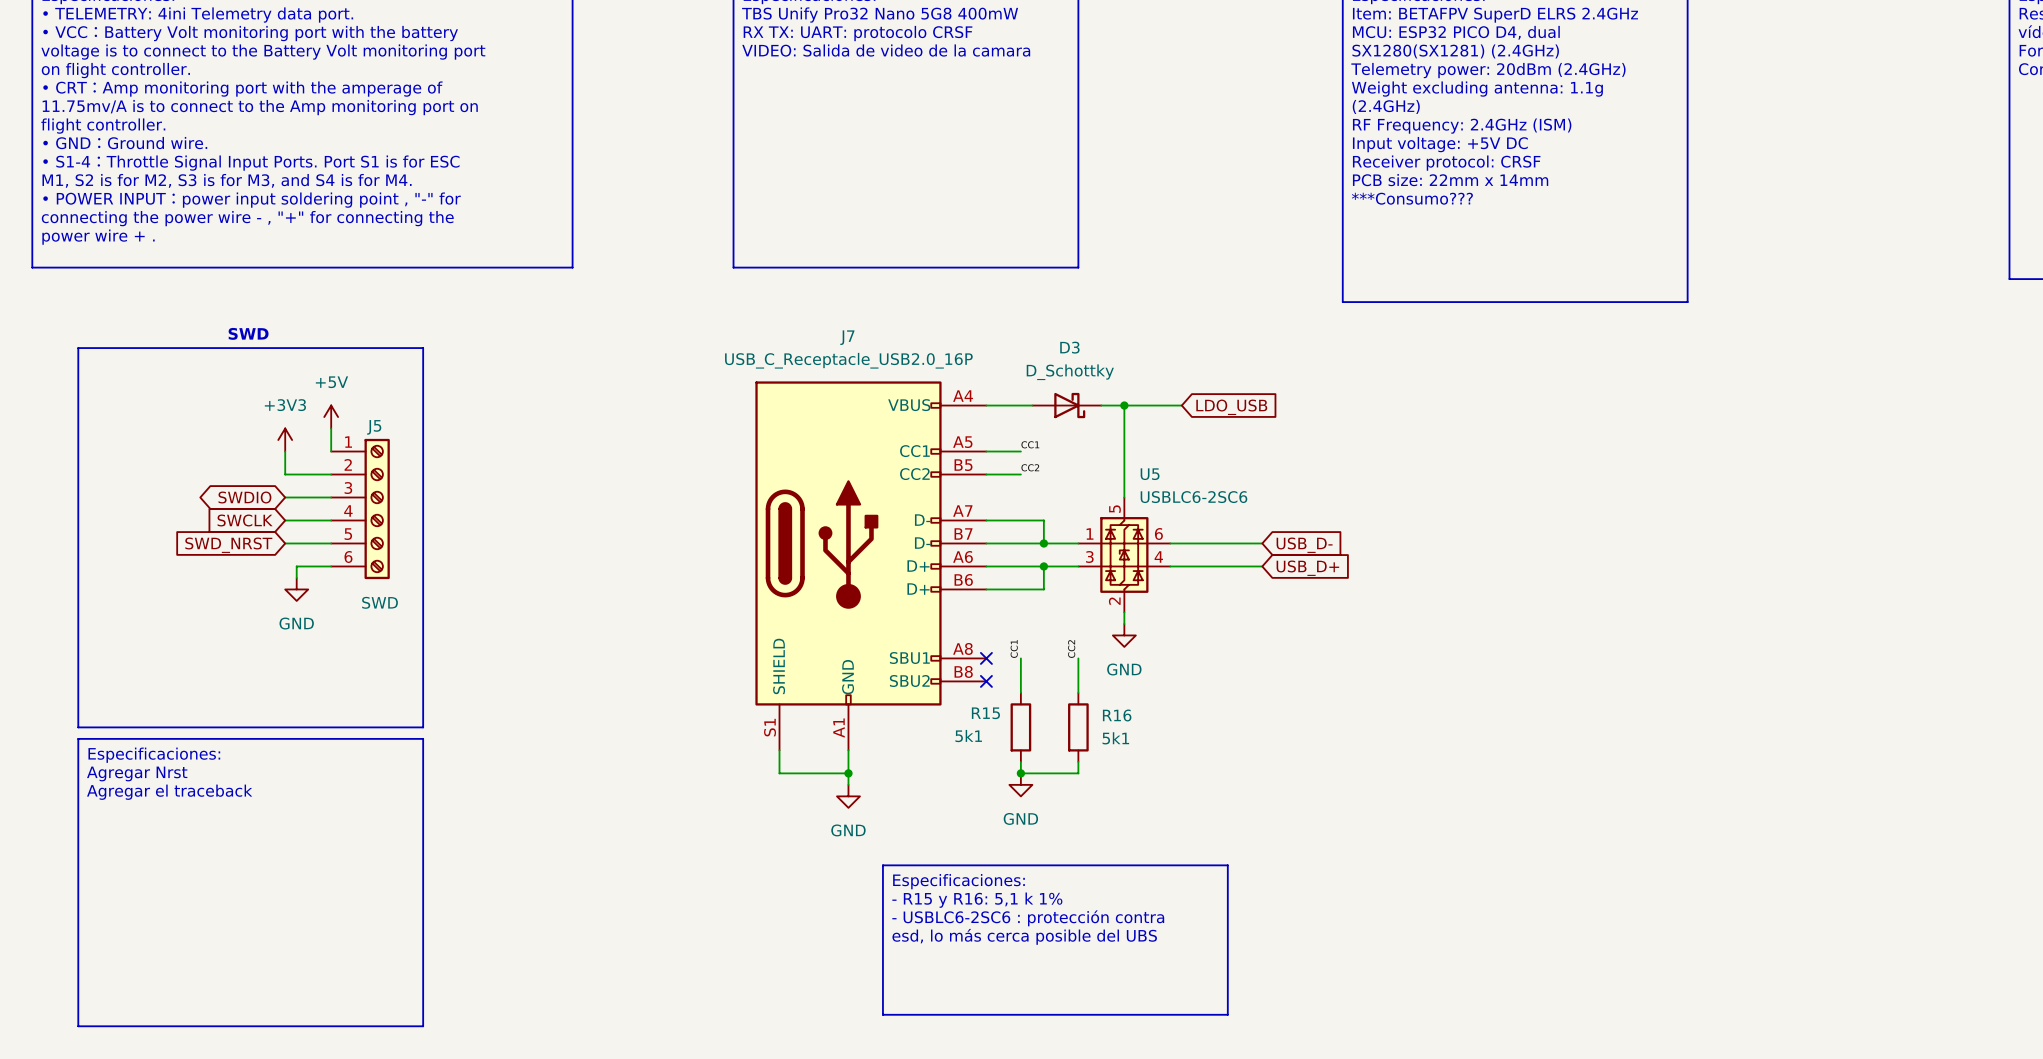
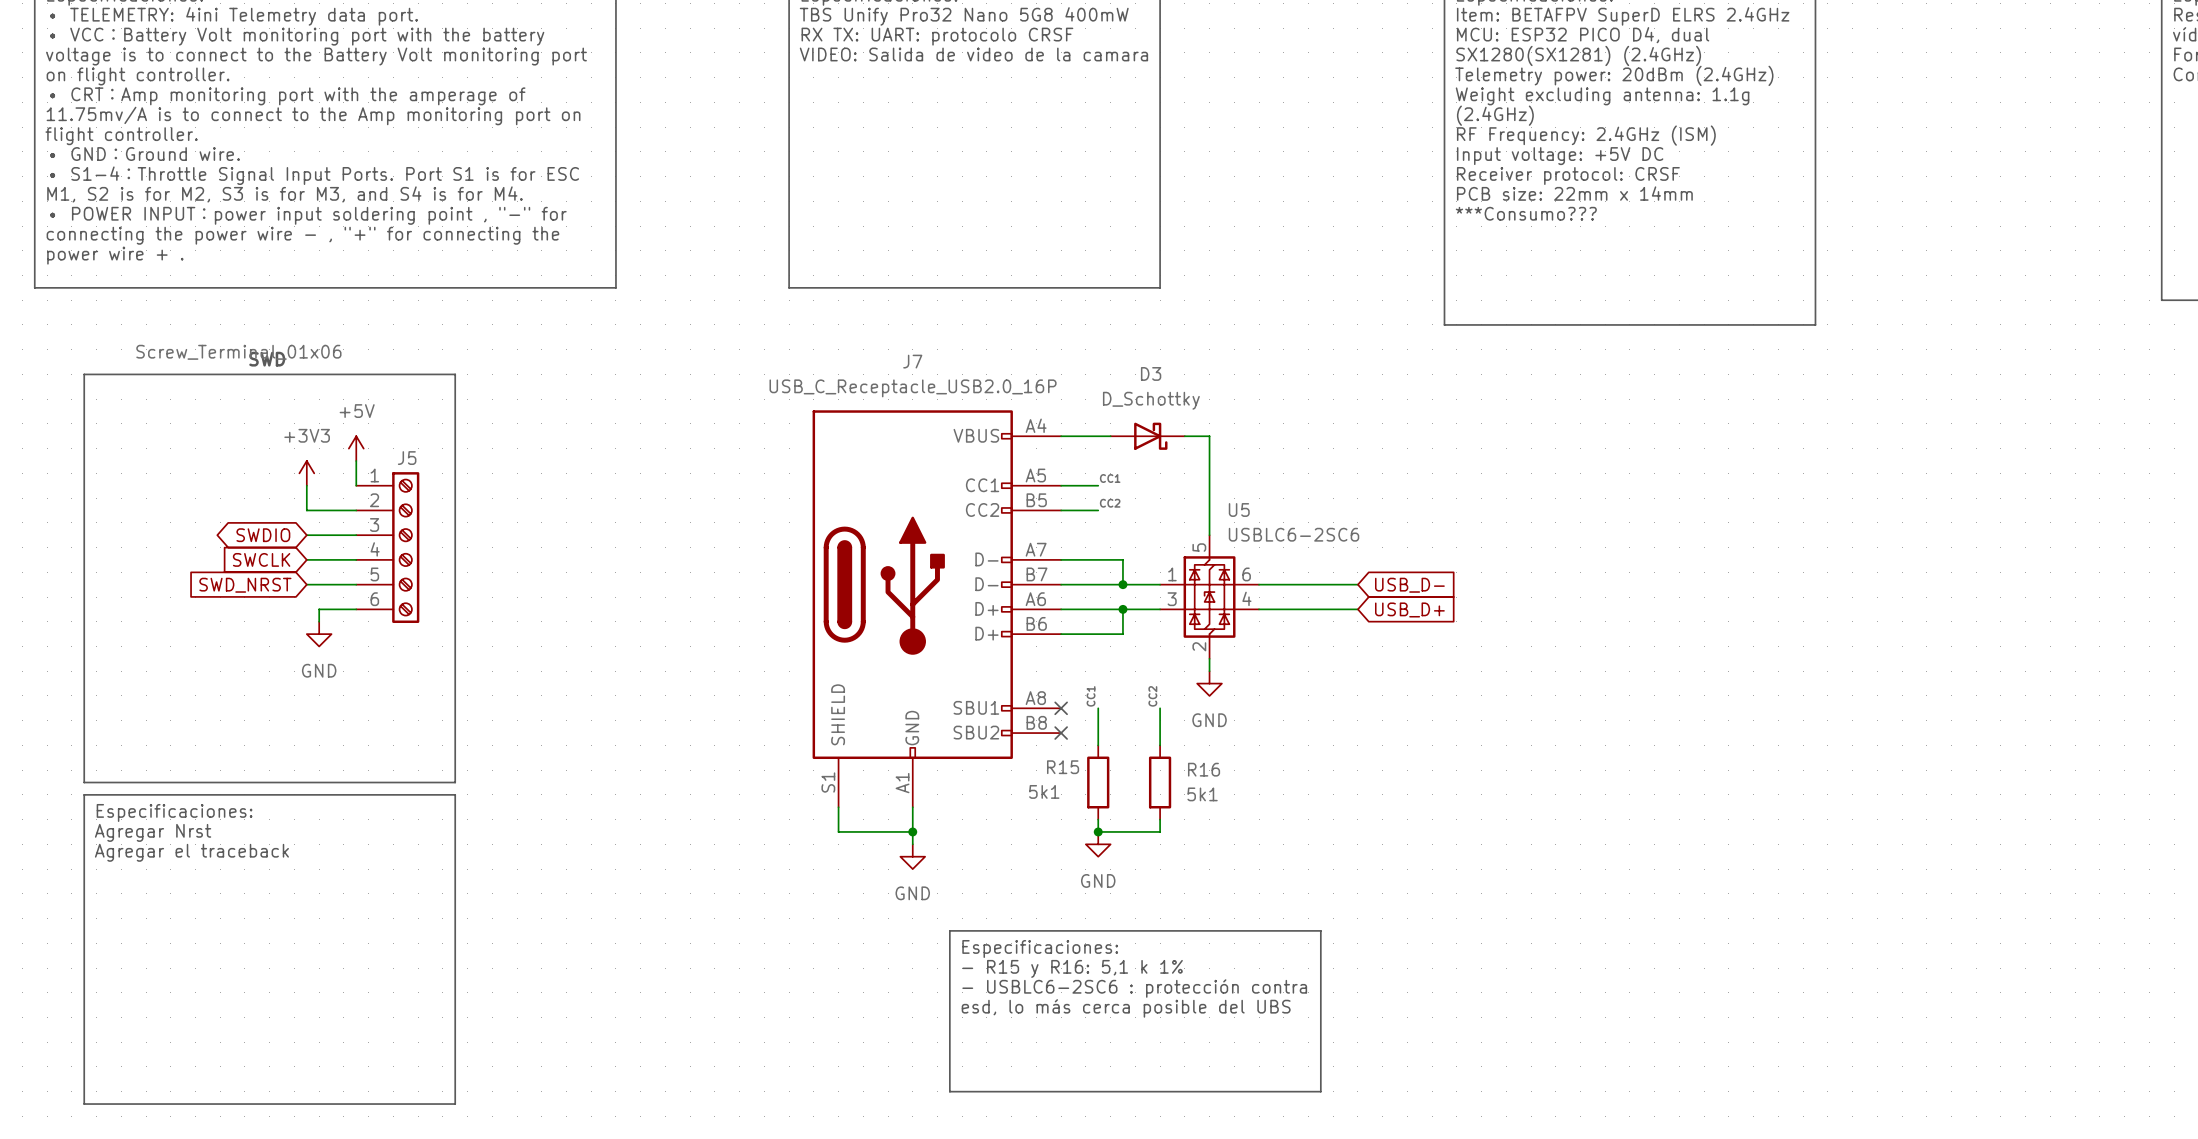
wire: (1124, 405) (1181, 405) -> none
junction: (1124, 405) -> none
global label: LDO_USB (1231, 407) -> none
J5 value: SWD (380, 602) -> Screw_Terminal_01x06 (238, 352)

